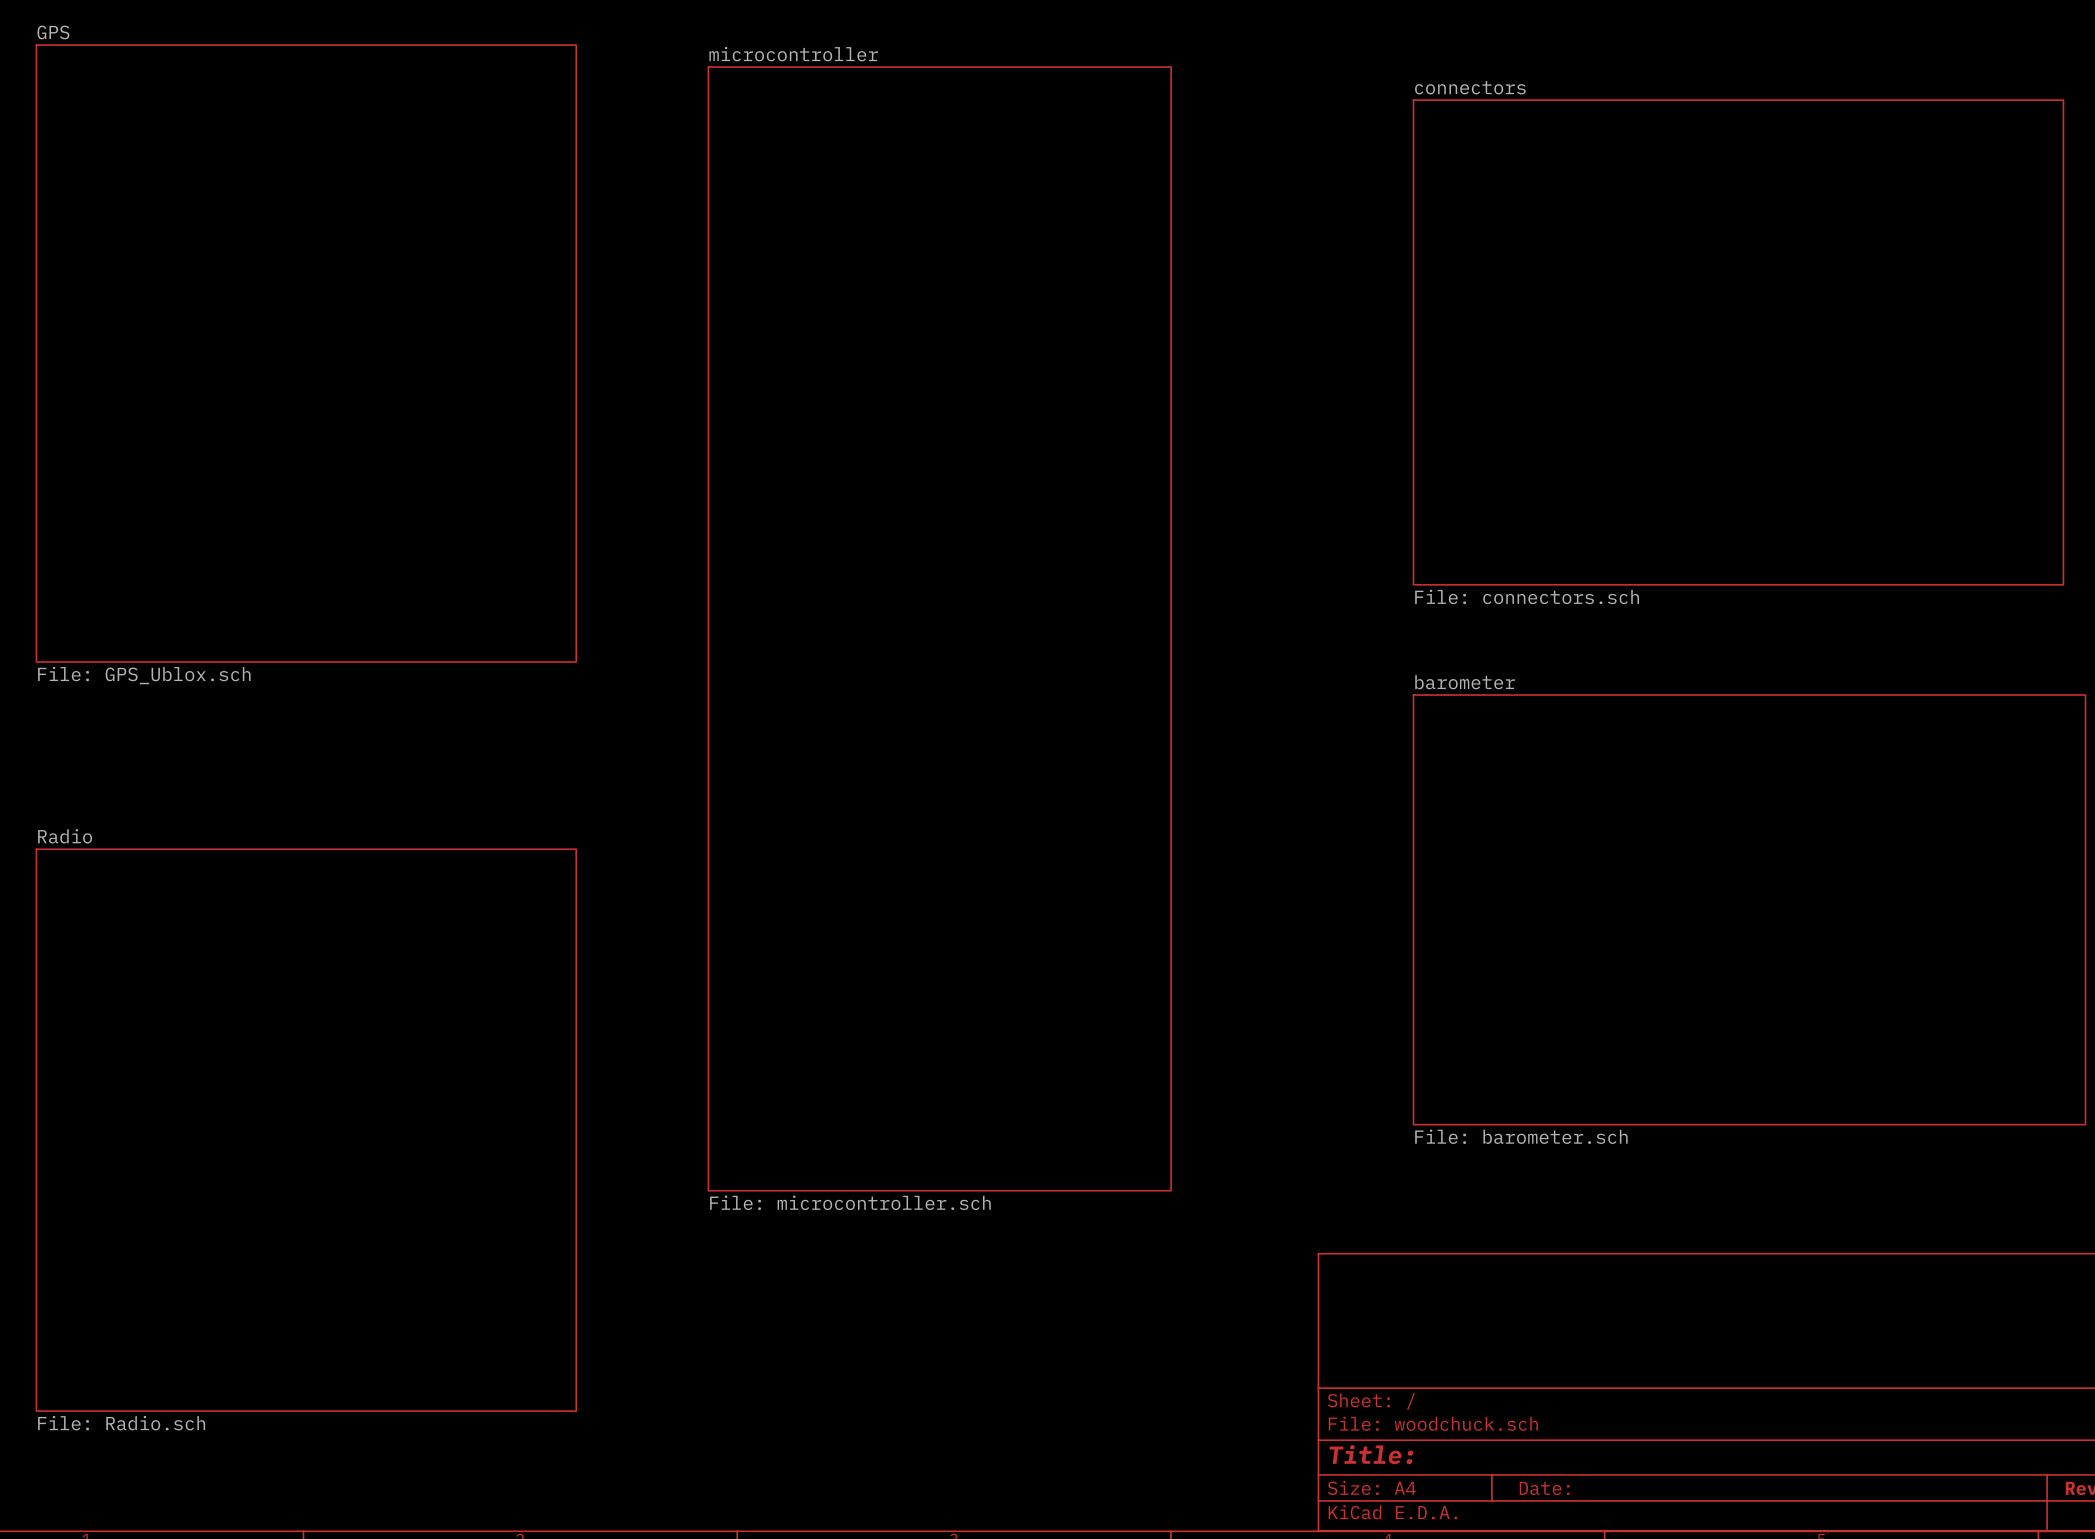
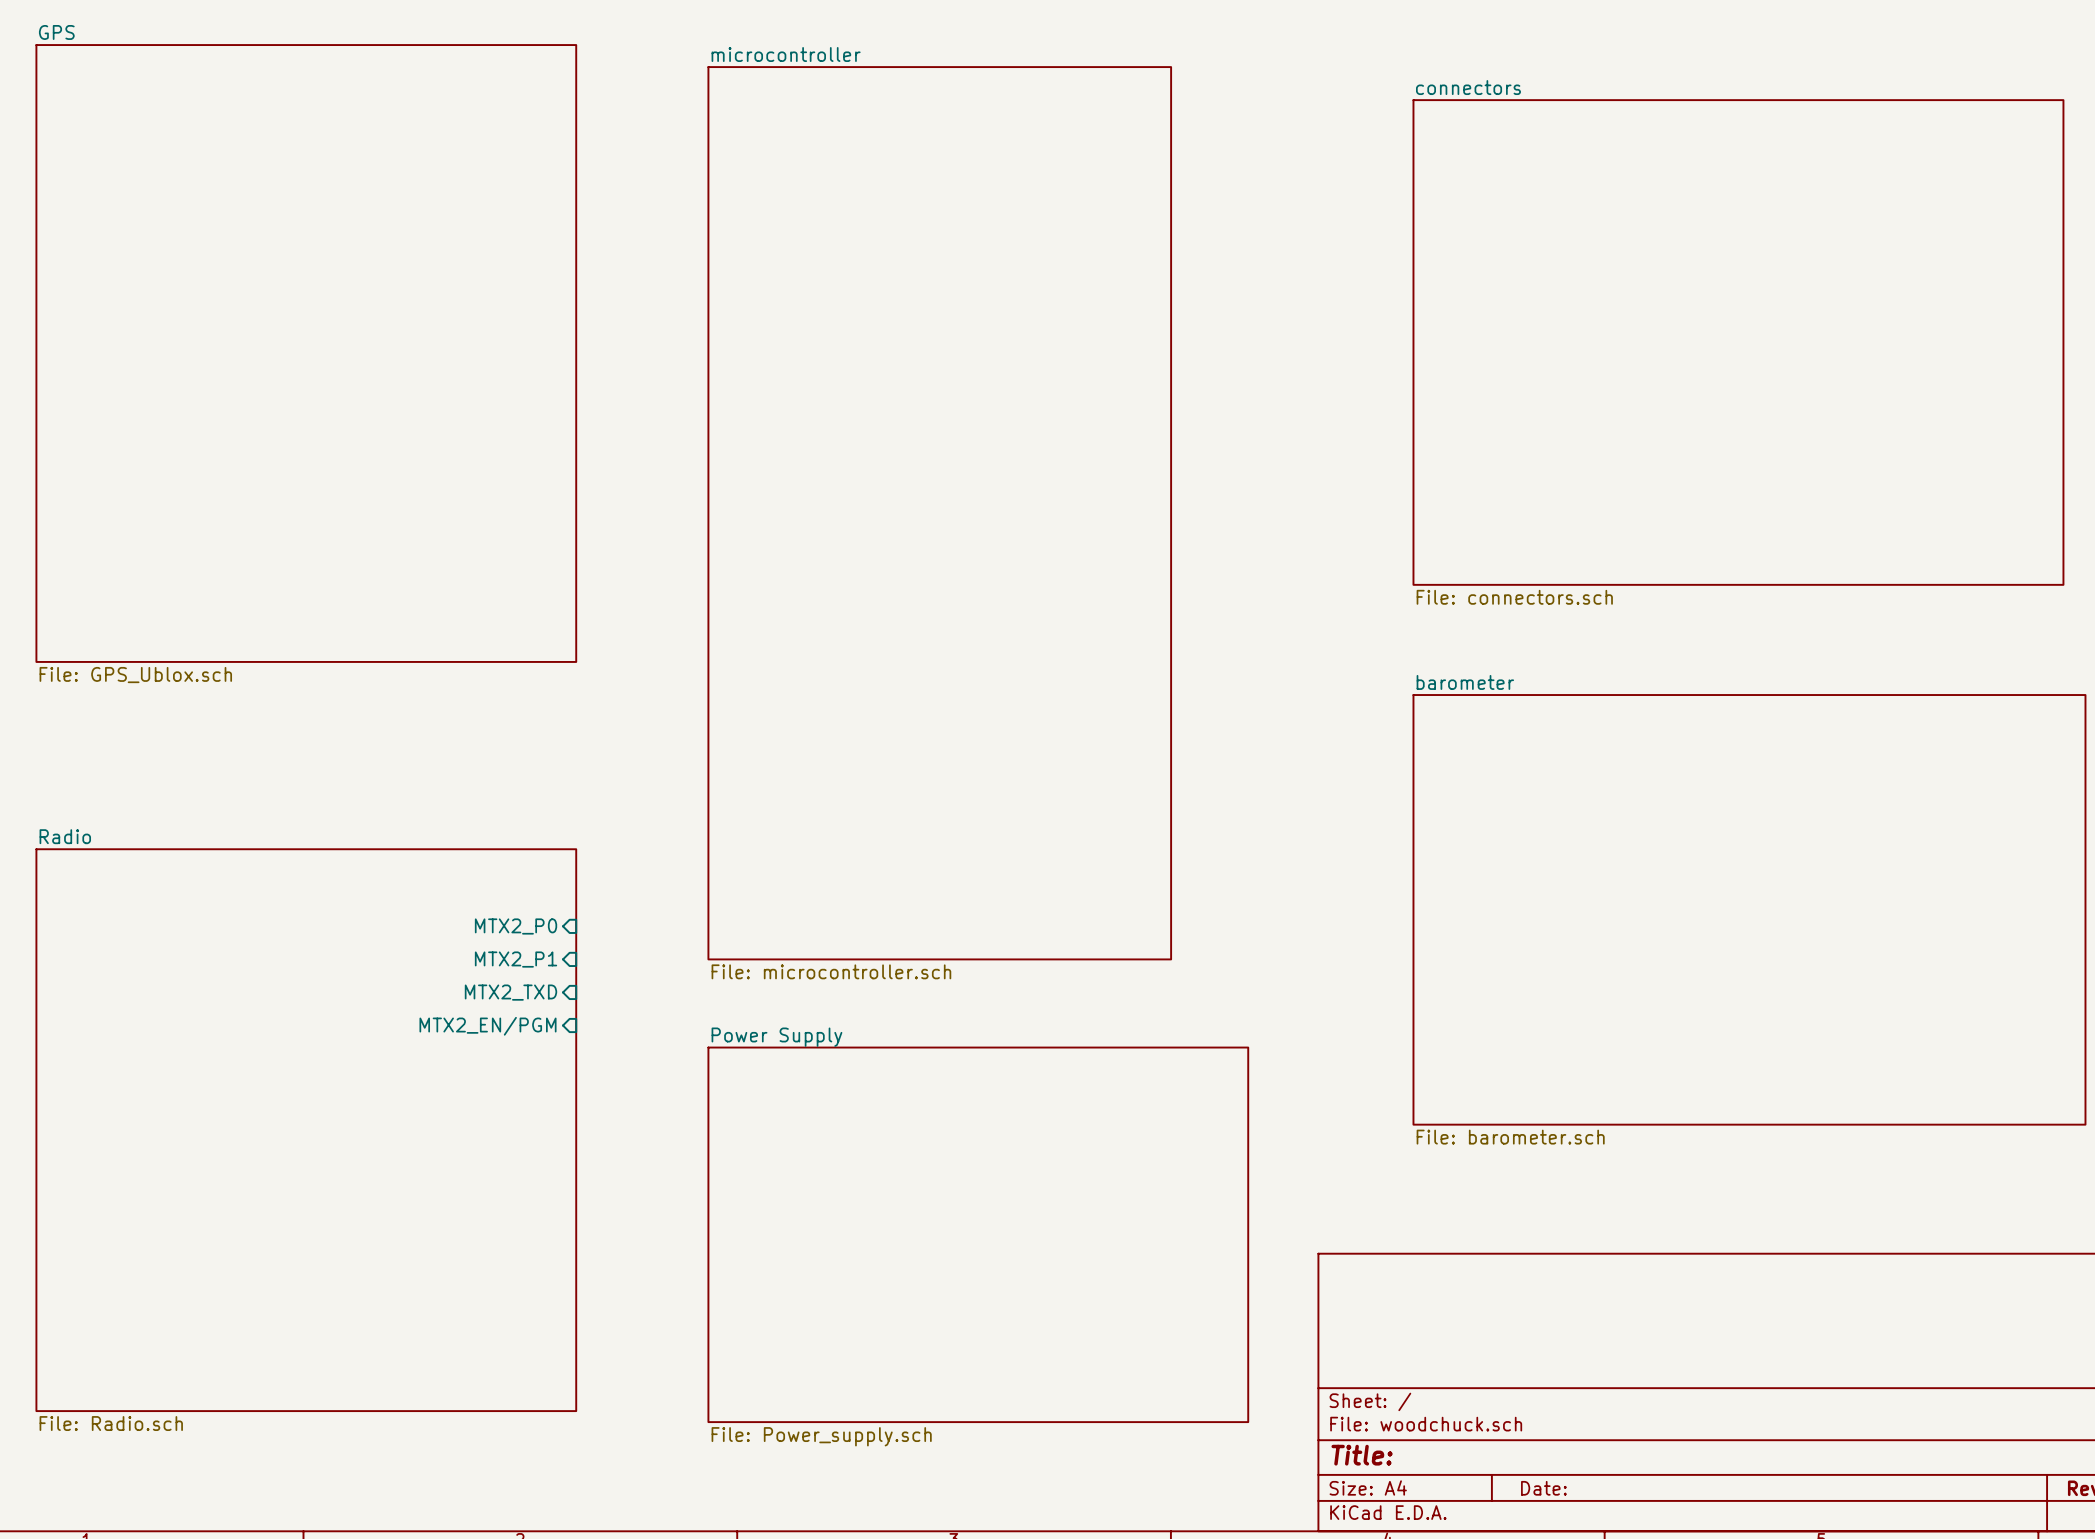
sheet microcontroller: none -> File: microcontroller.sch (939, 513)
sheet microcontroller: File: microcontroller.sch (939, 628) -> none
sheet pin: none -> MTX2_P0 (516, 926)
sheet pin: none -> MTX2_P1 (516, 959)
sheet pin: none -> MTX2_TXD (510, 992)
sheet pin: none -> MTX2_EN/PGM (488, 1026)
sheet Power Supply: none -> File: Power_supply.sch (978, 1234)

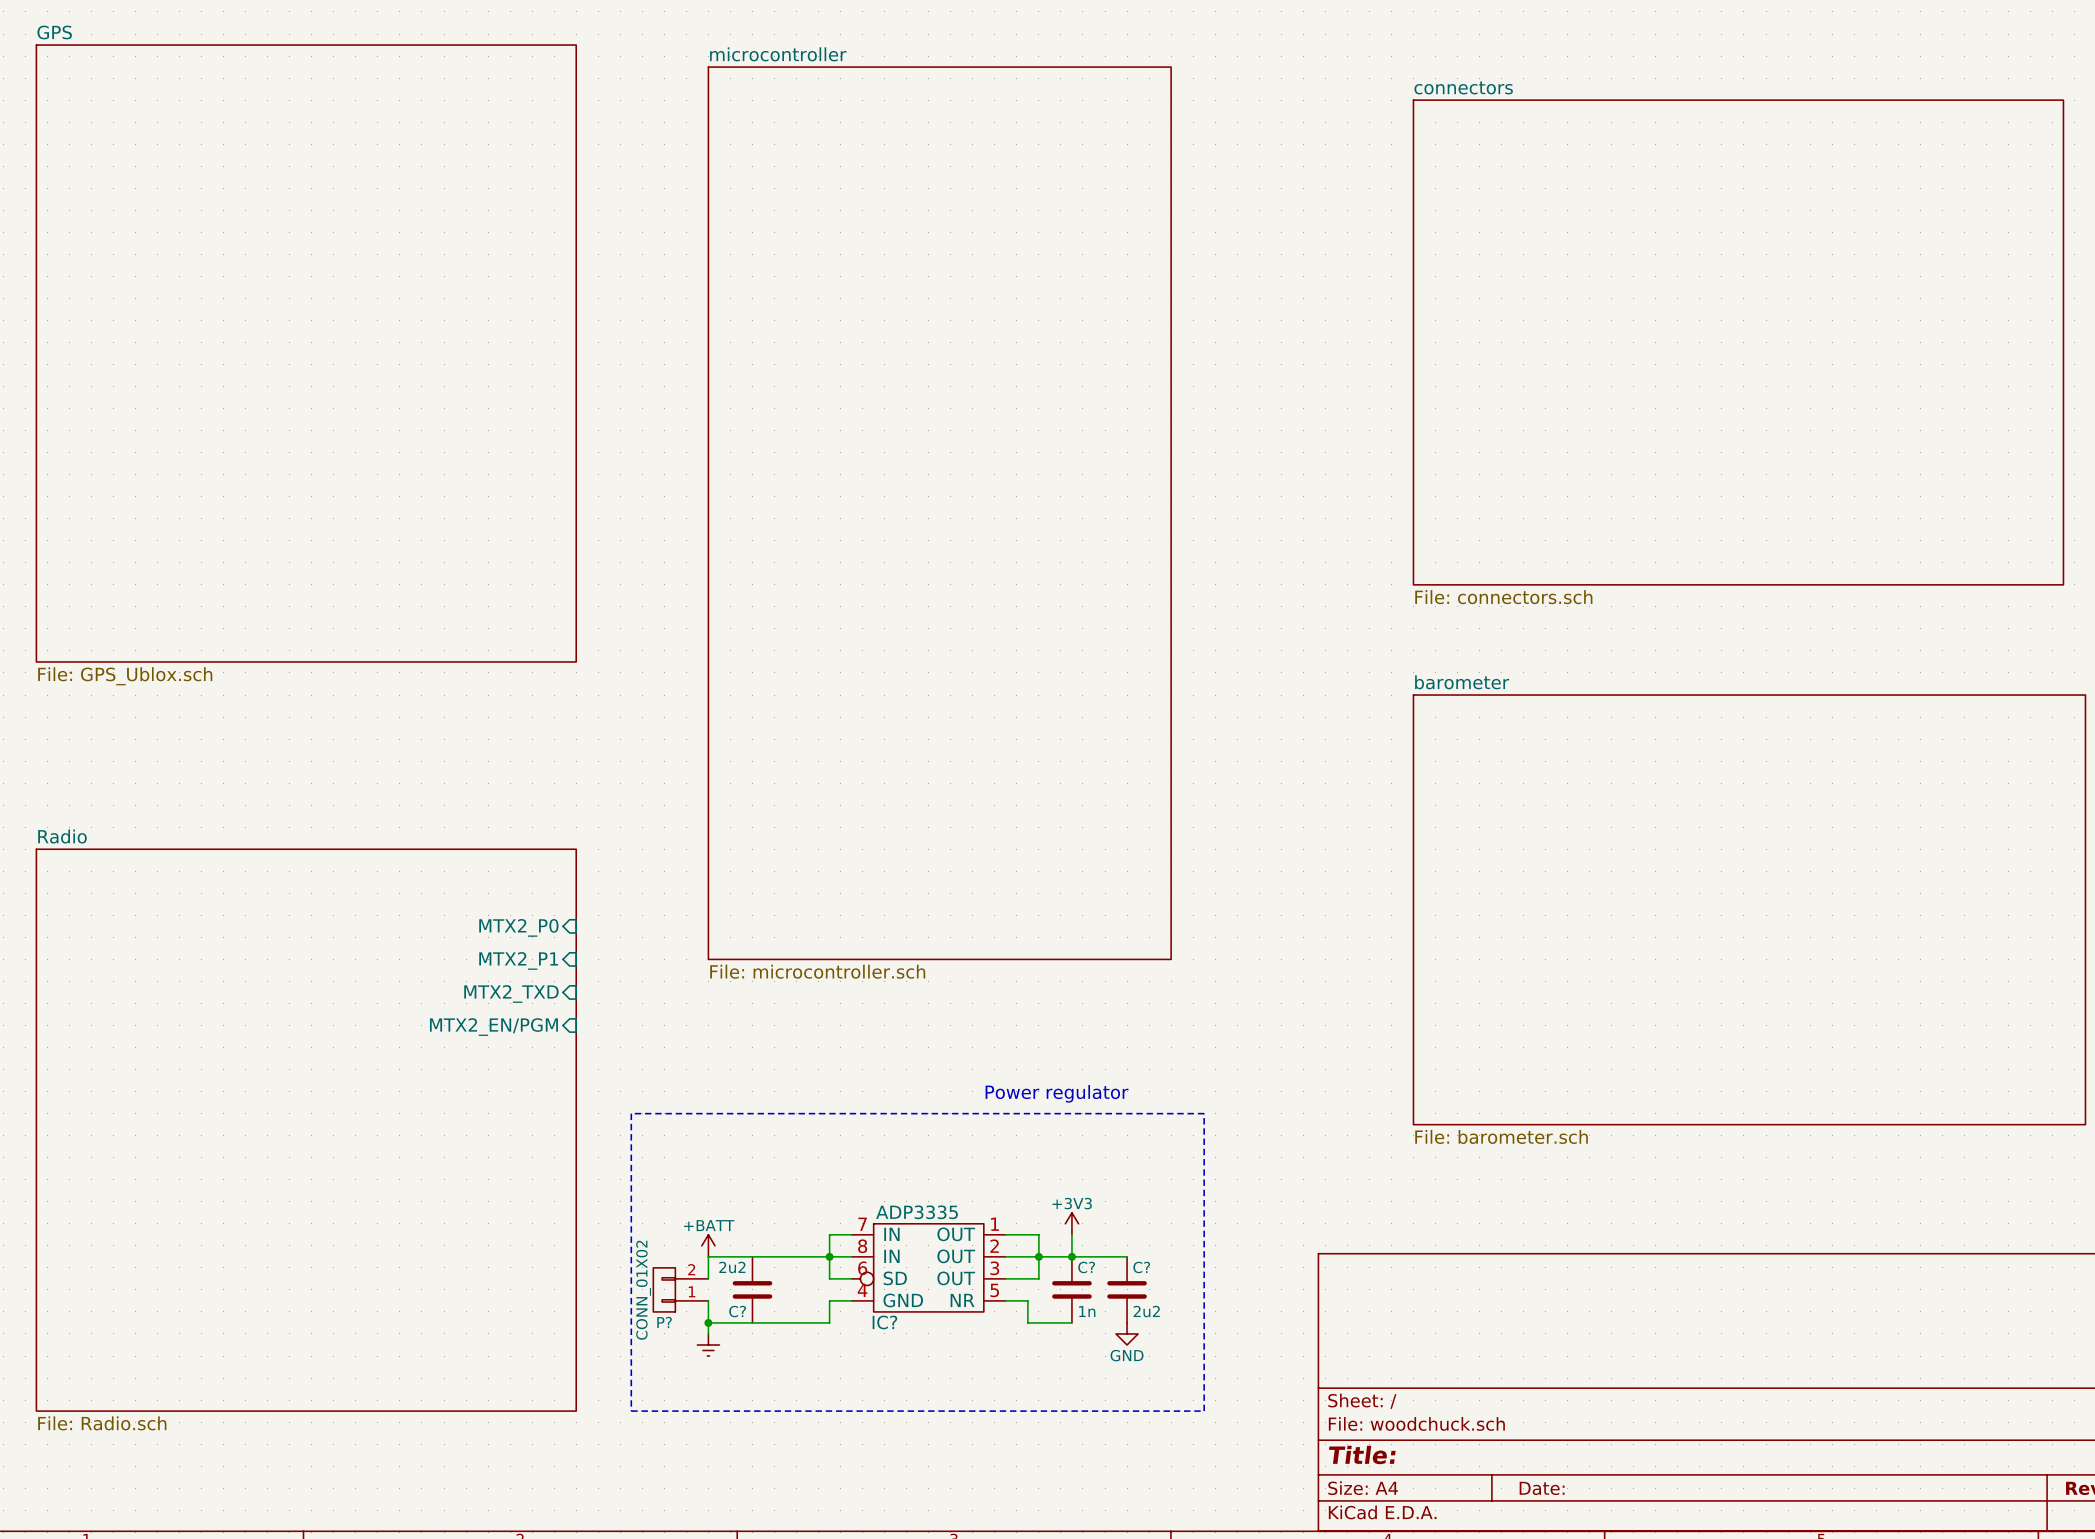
text: none -> Power regulator (1057, 1093)
line: none -> (631, 1113) (1204, 1113) (1204, 1411) (631, 1411) (631, 1113)
power symbol: none -> +3V3 (1071, 1223)
wire: none -> (851, 1234) (829, 1234) (829, 1278) (851, 1278)
sheet Power Supply: File: Power_supply.sch (978, 1234) -> none
wire: none -> (1005, 1234) (1038, 1234) (1038, 1278) (1005, 1278)
wire: none -> (1071, 1234) (1071, 1256)
power symbol: none -> +BATT (708, 1245)
junction: none -> (829, 1256)
wire: none -> (851, 1256) (708, 1256) (708, 1278)
wire: none -> (1005, 1256) (1127, 1256)
junction: none -> (1038, 1256)
junction: none -> (1071, 1256)
IC?: none -> ADP3335 (928, 1267)
P?: none -> CONN_01X02 (680, 1289)
C?: none -> 2u2 (752, 1289)
C?: none -> 1n (1071, 1289)
C?: none -> 2u2 (1127, 1289)
wire: none -> (851, 1300) (829, 1300) (829, 1322) (708, 1322)
wire: none -> (1005, 1300) (1027, 1300) (1027, 1322) (1071, 1322)
junction: none -> (708, 1322)
power symbol: none -> GND (1127, 1333)
power symbol: none -> (708, 1344)

